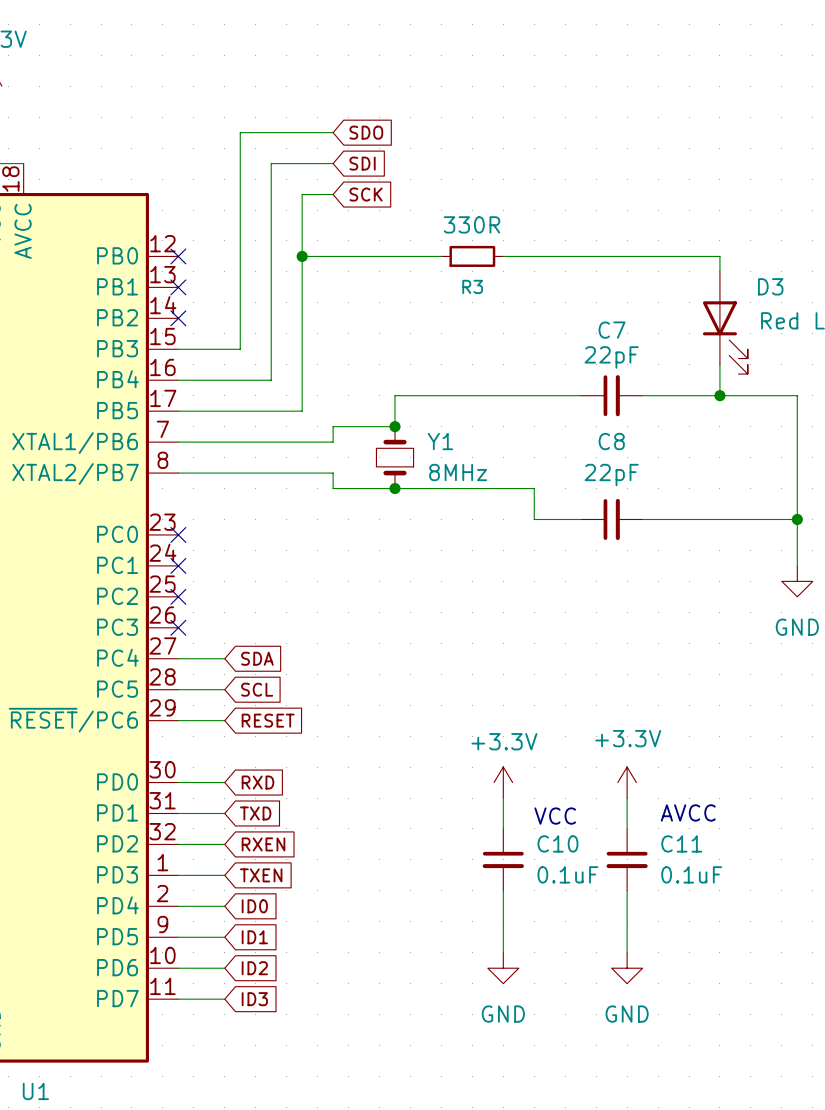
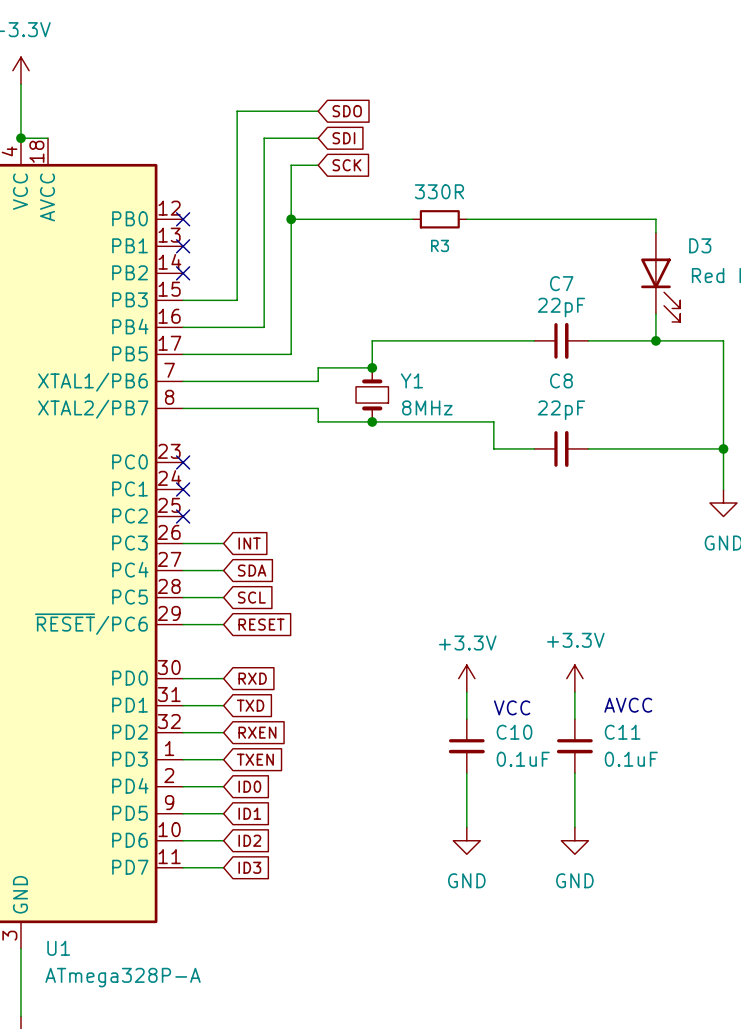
wire: none -> (183, 543) (223, 543)
no-connect mark: (178, 627) -> none
global label: none -> INT (249, 543)

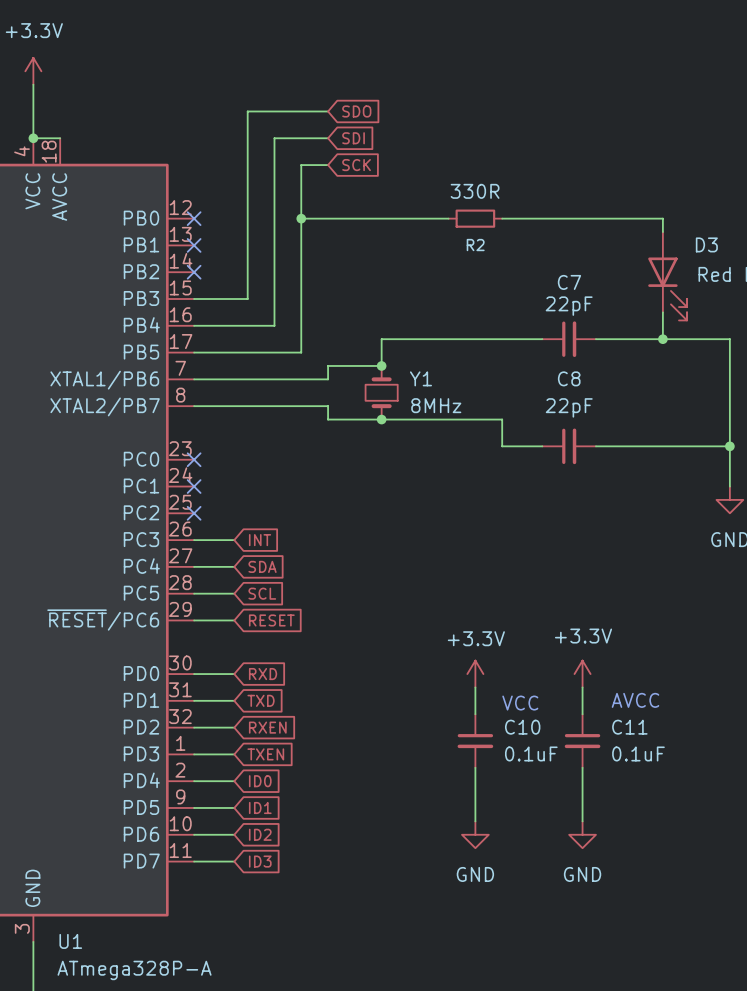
R3: 330R (439, 219) -> none
wire: (466, 219) (493, 219) -> (421, 218) (448, 218)
R2: none -> 330R (475, 218)

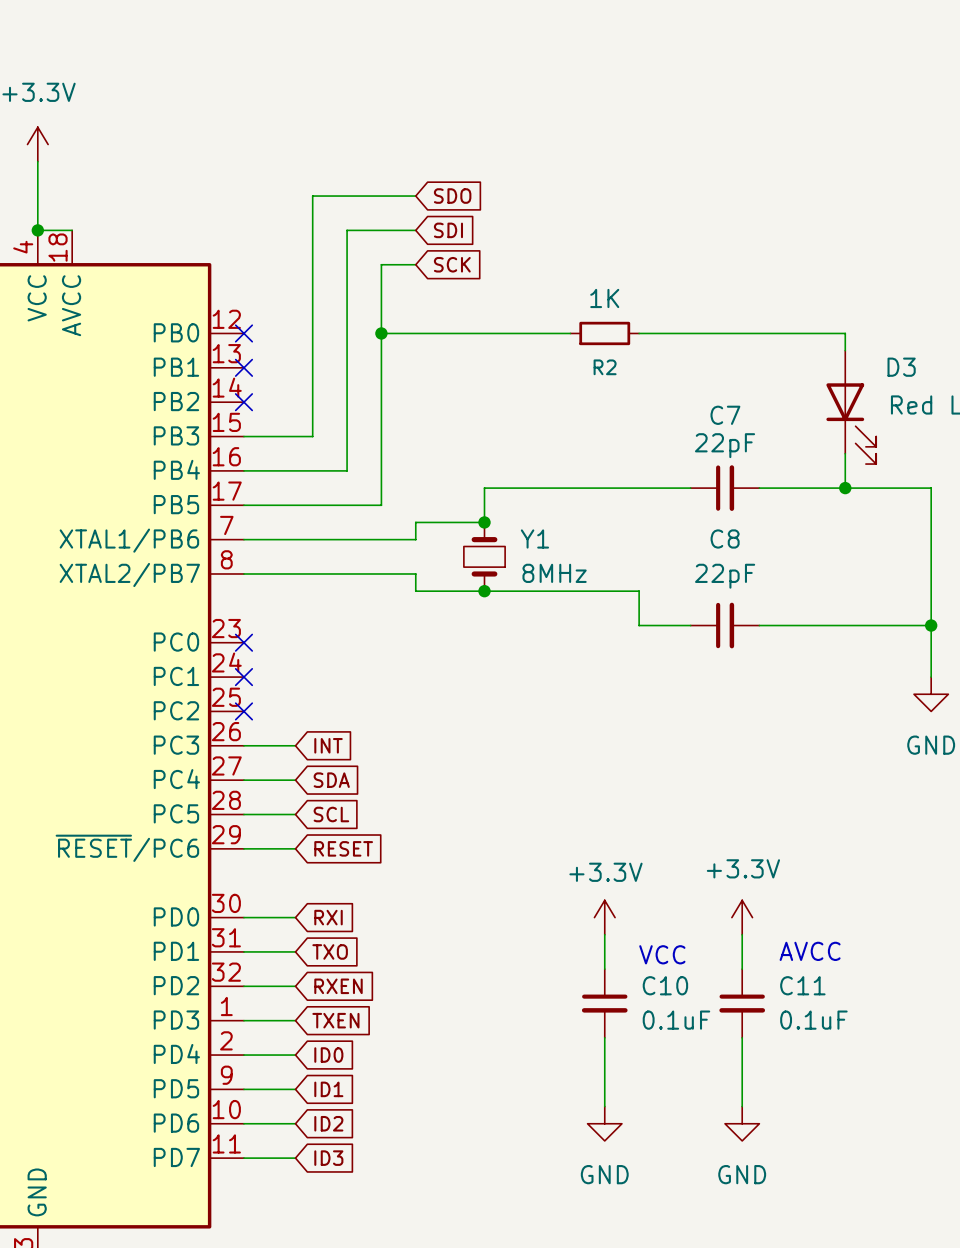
R2 value: 330R (475, 191) -> 1K (604, 298)
global label: RXD (263, 674) -> RXI (328, 917)
global label: TXD (261, 700) -> TXO (330, 951)

